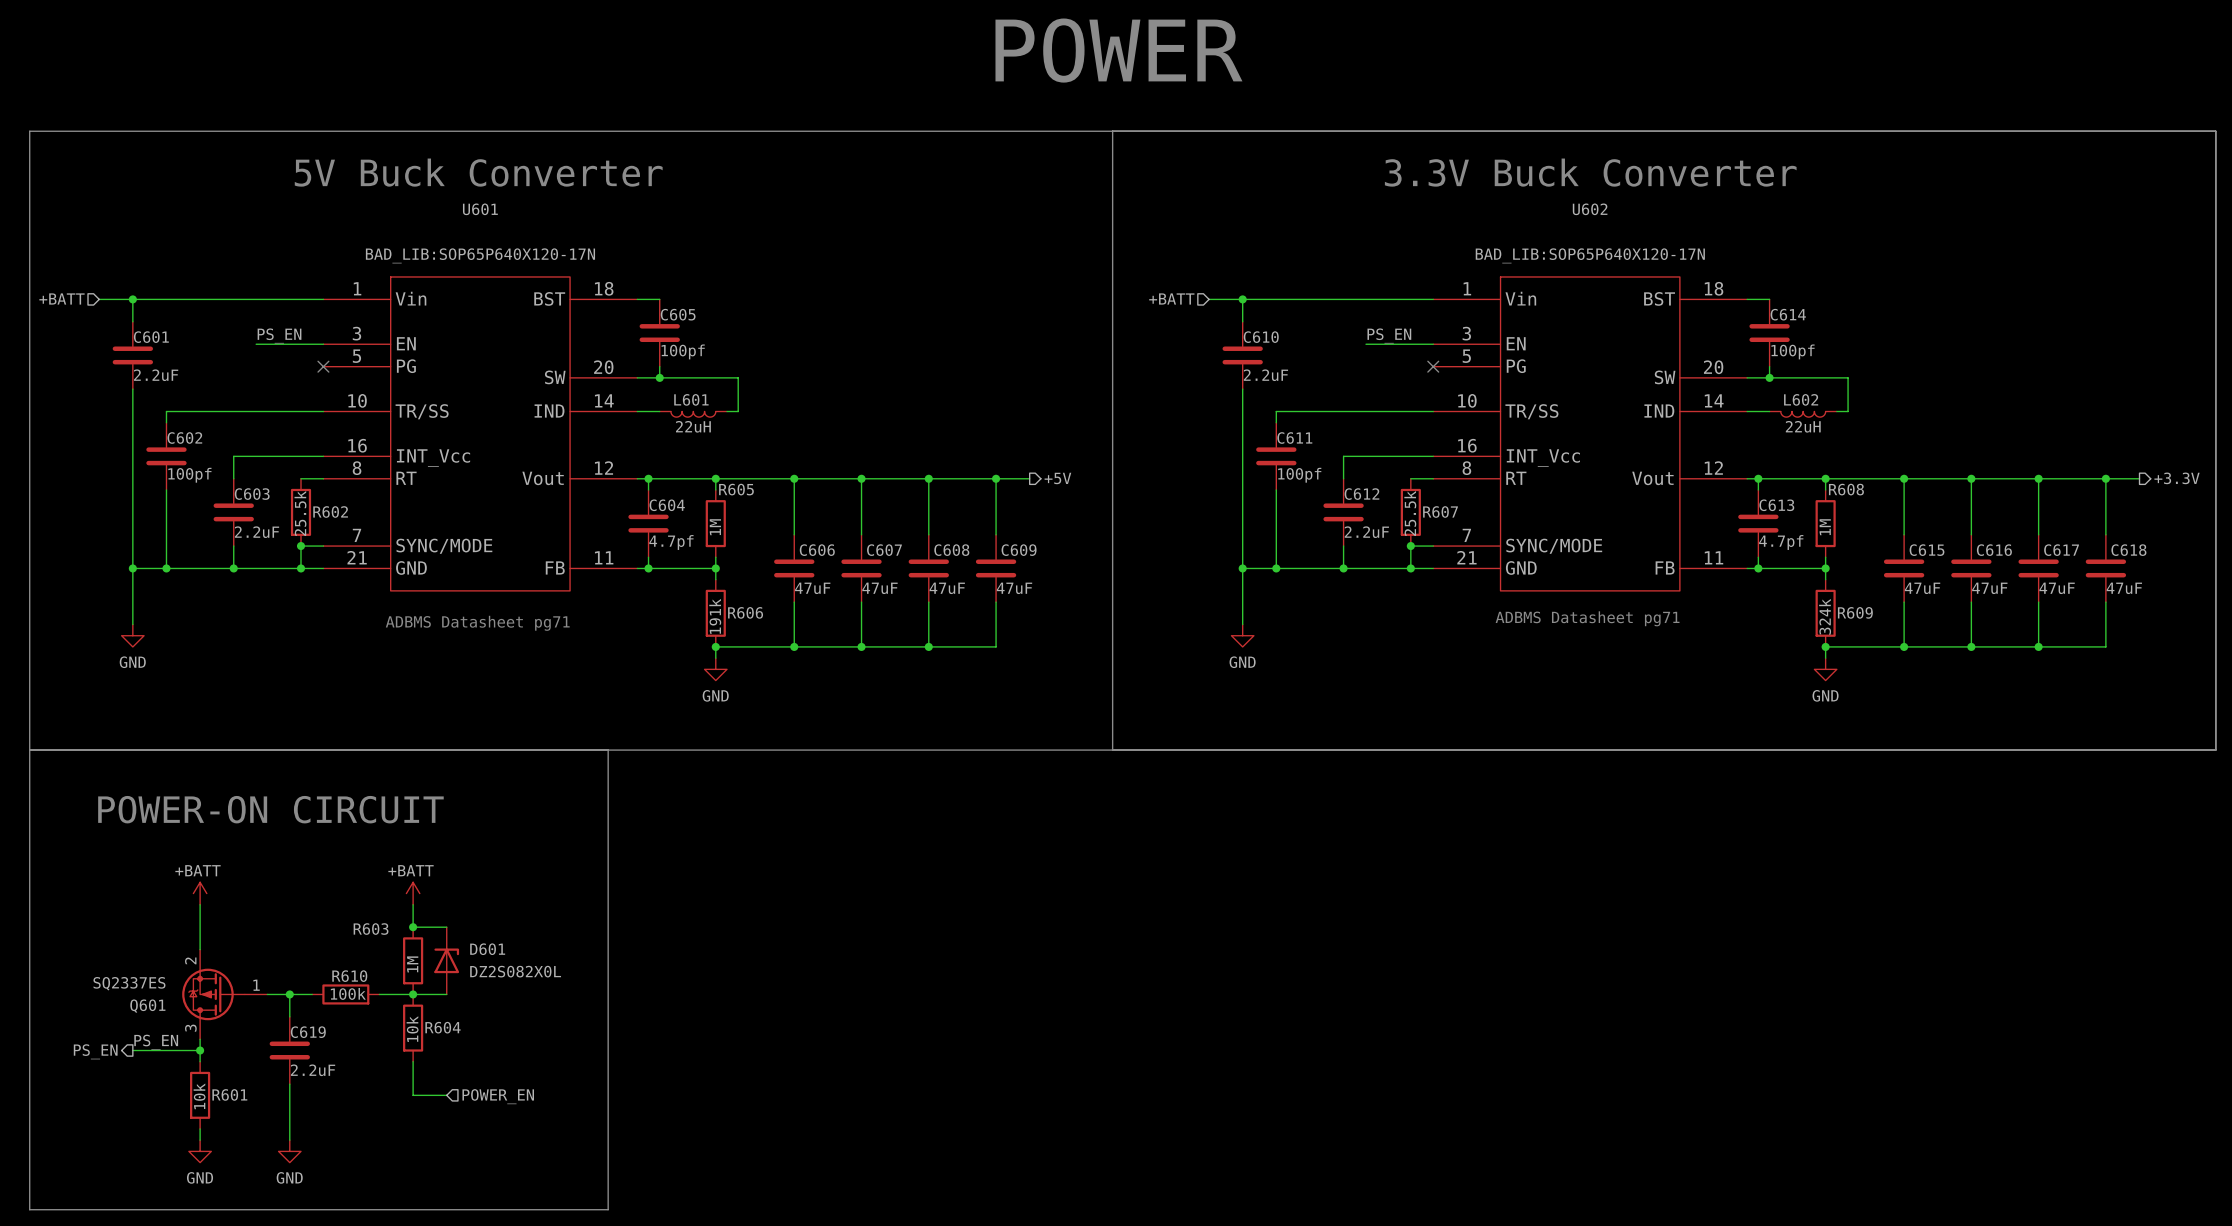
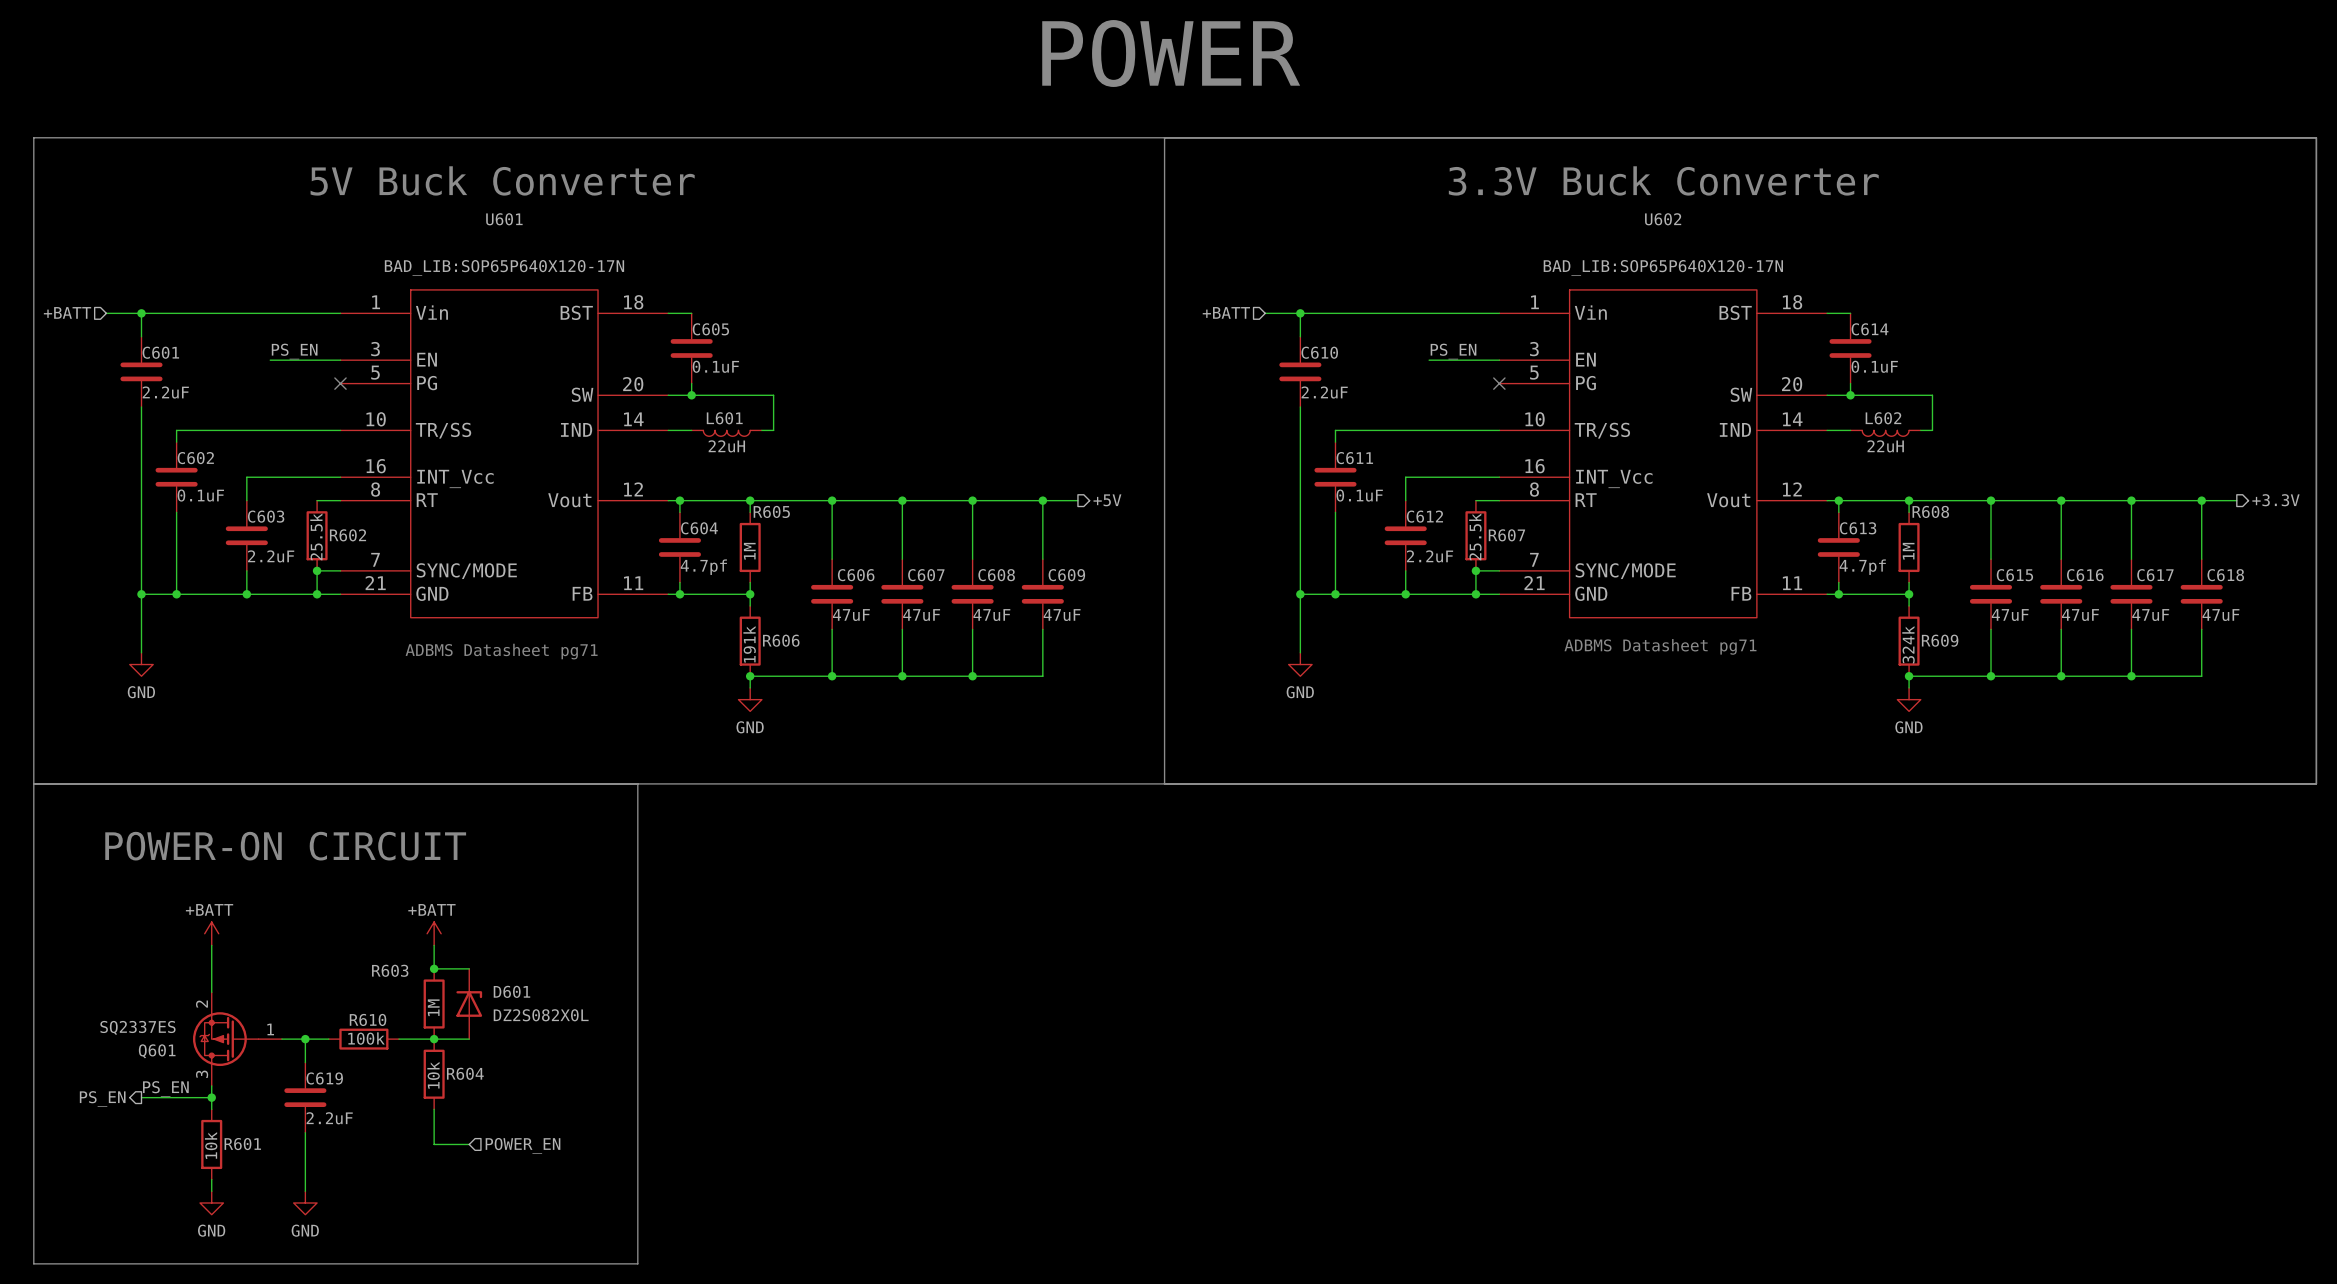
C605 value: 100pf (683, 351) -> 0.1uF (715, 366)
C614 value: 100pf (1793, 351) -> 0.1uF (1874, 366)
C602 value: 100pf (189, 475) -> 0.1uF (200, 495)
C611 value: 100pf (1299, 475) -> 0.1uF (1359, 495)

